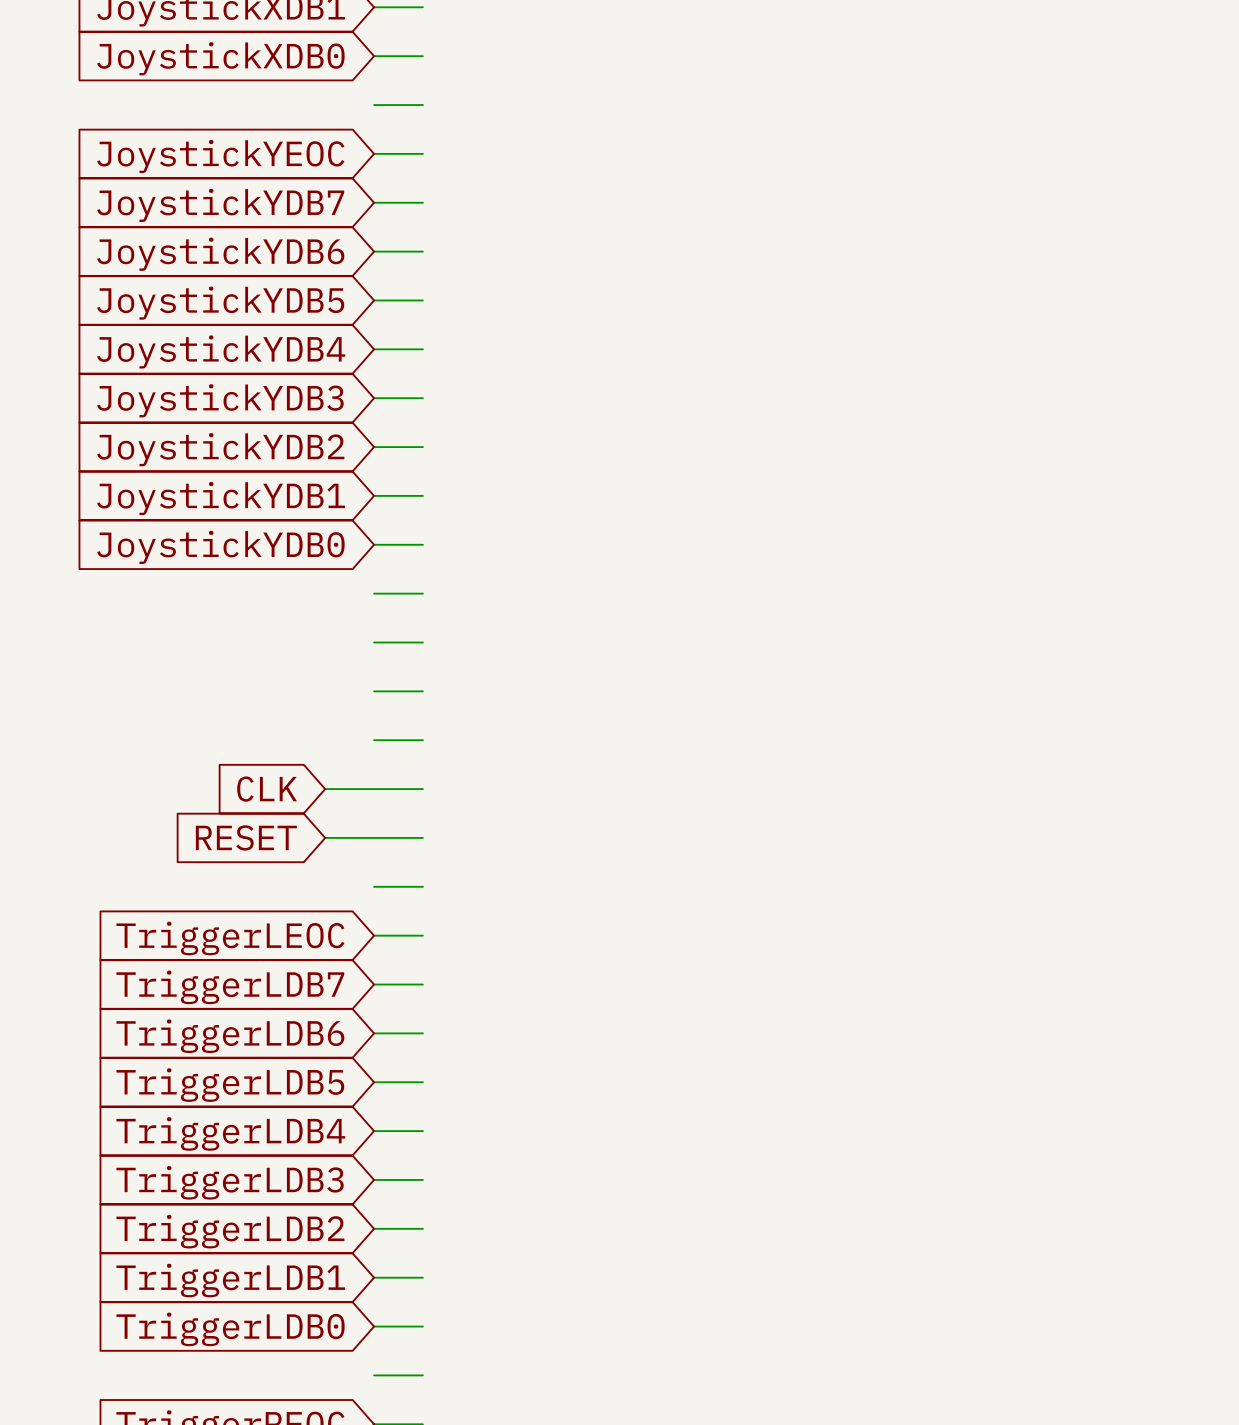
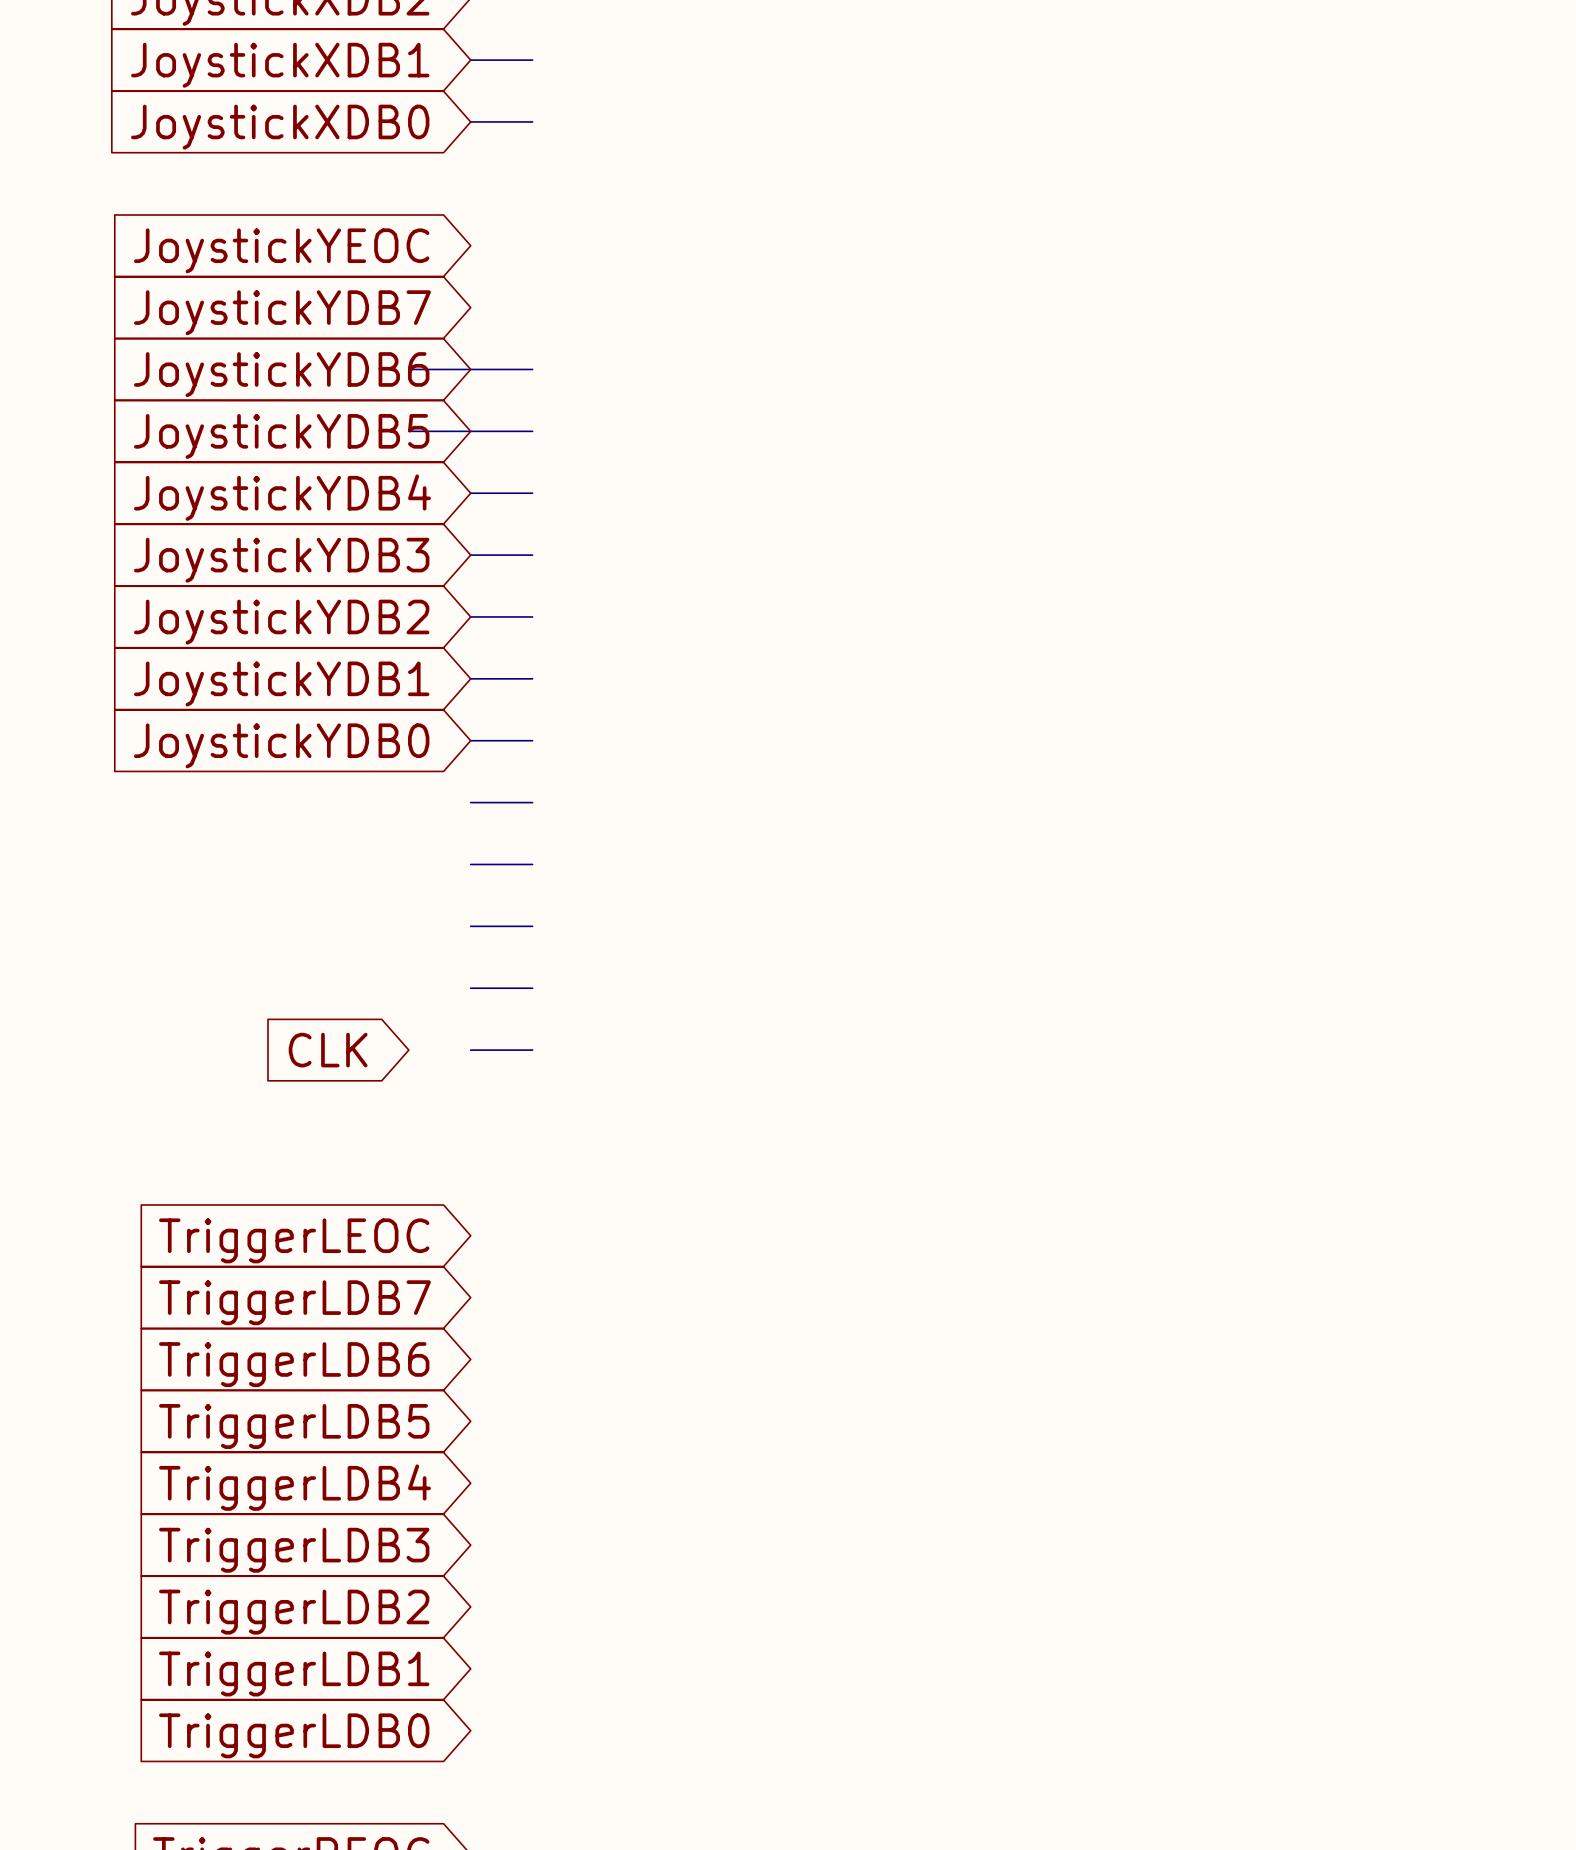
wire: (374, 105) (422, 105) -> none
wire: (374, 153) (422, 153) -> (408, 369) (470, 369)
wire: (374, 202) (422, 202) -> (408, 431) (470, 431)
wire: (325, 789) (374, 789) -> none
global label: RESET (246, 837) -> none
wire: (325, 837) (422, 837) -> none
wire: (374, 886) (422, 886) -> none
wire: (374, 935) (422, 935) -> none
wire: (374, 984) (422, 984) -> none
wire: (374, 1033) (422, 1033) -> none
wire: (374, 1082) (422, 1082) -> none
wire: (374, 1131) (422, 1131) -> none
wire: (374, 1179) (422, 1179) -> none
wire: (374, 1228) (422, 1228) -> none
wire: (374, 1277) (422, 1277) -> none
wire: (374, 1326) (422, 1326) -> none
wire: (374, 1375) (422, 1375) -> none

